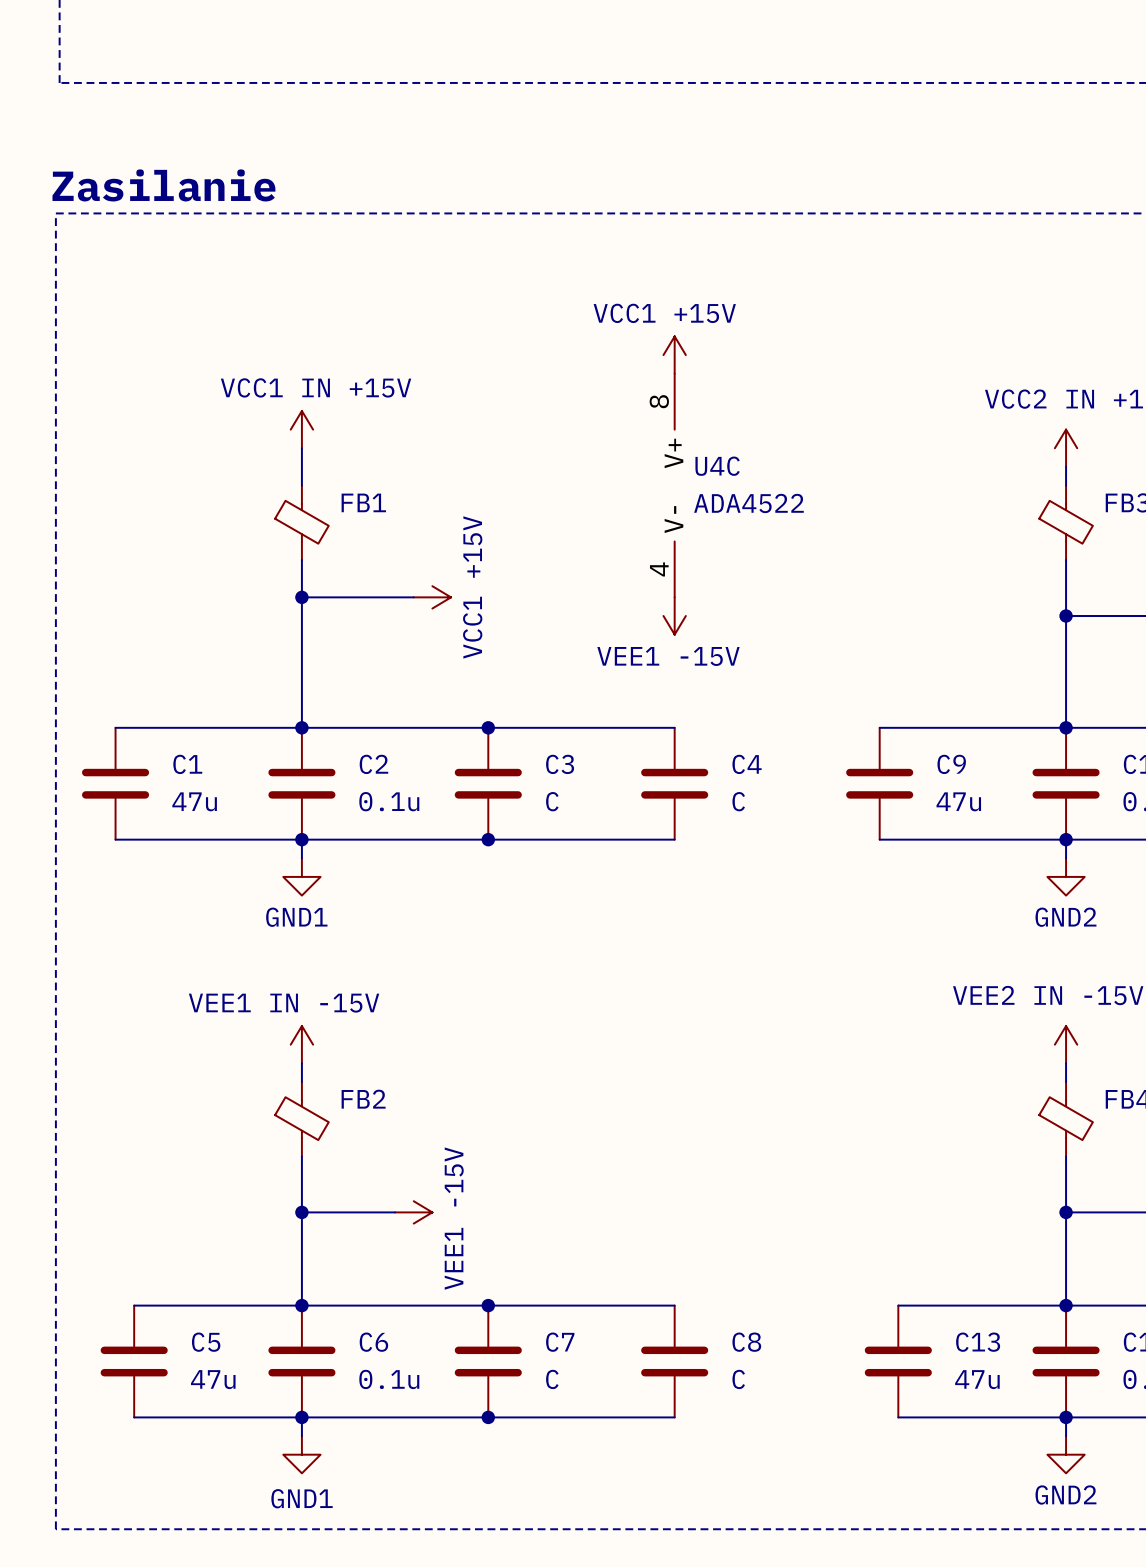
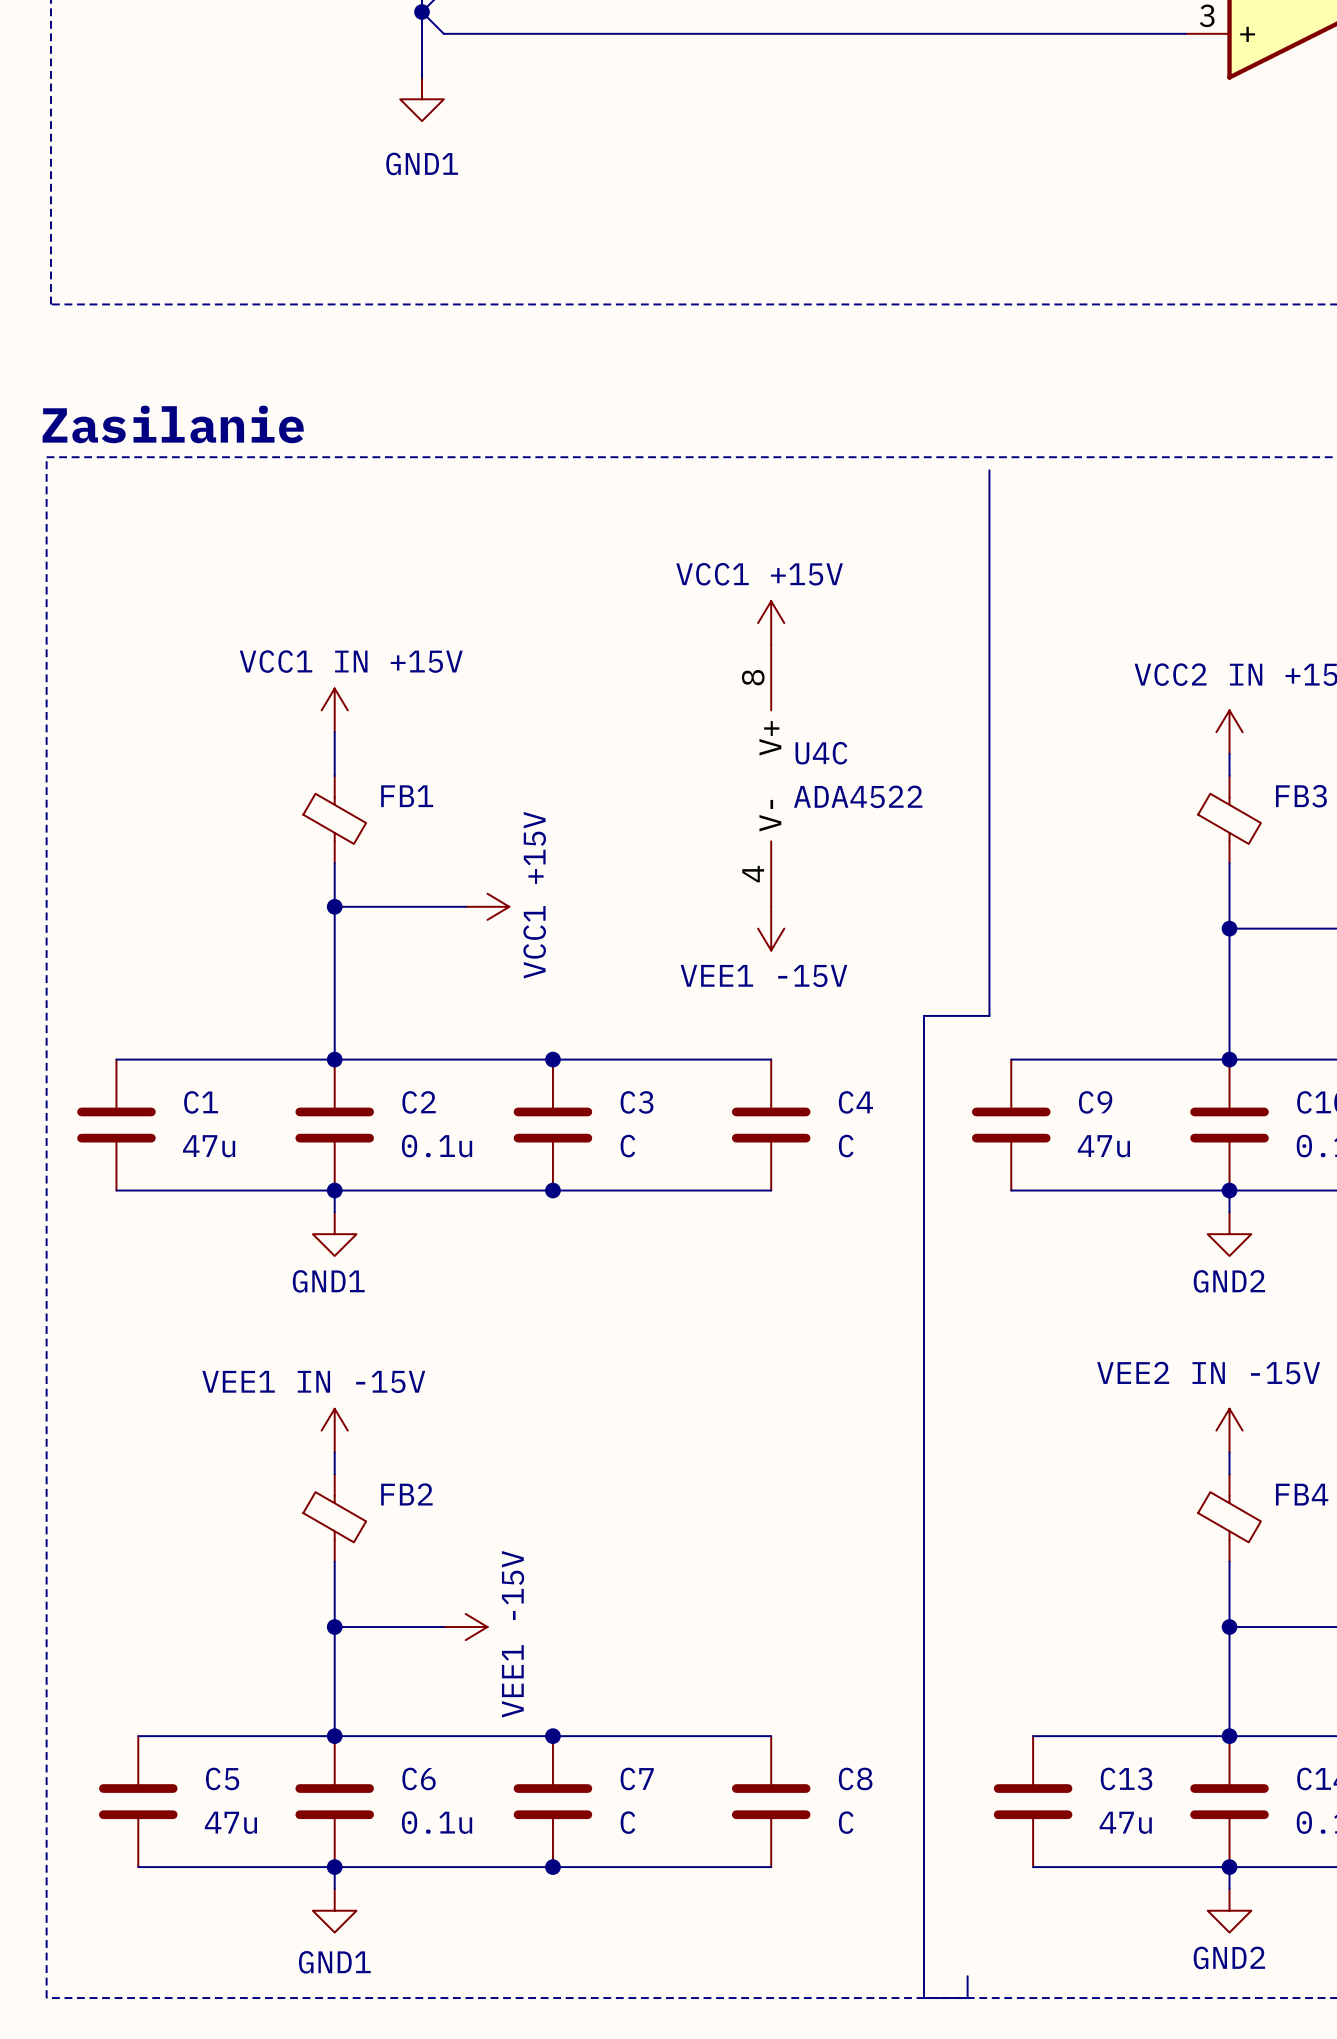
line: none -> (989, 470) (989, 1015) (923, 1015) (923, 1998) (967, 1998) (967, 1976)

